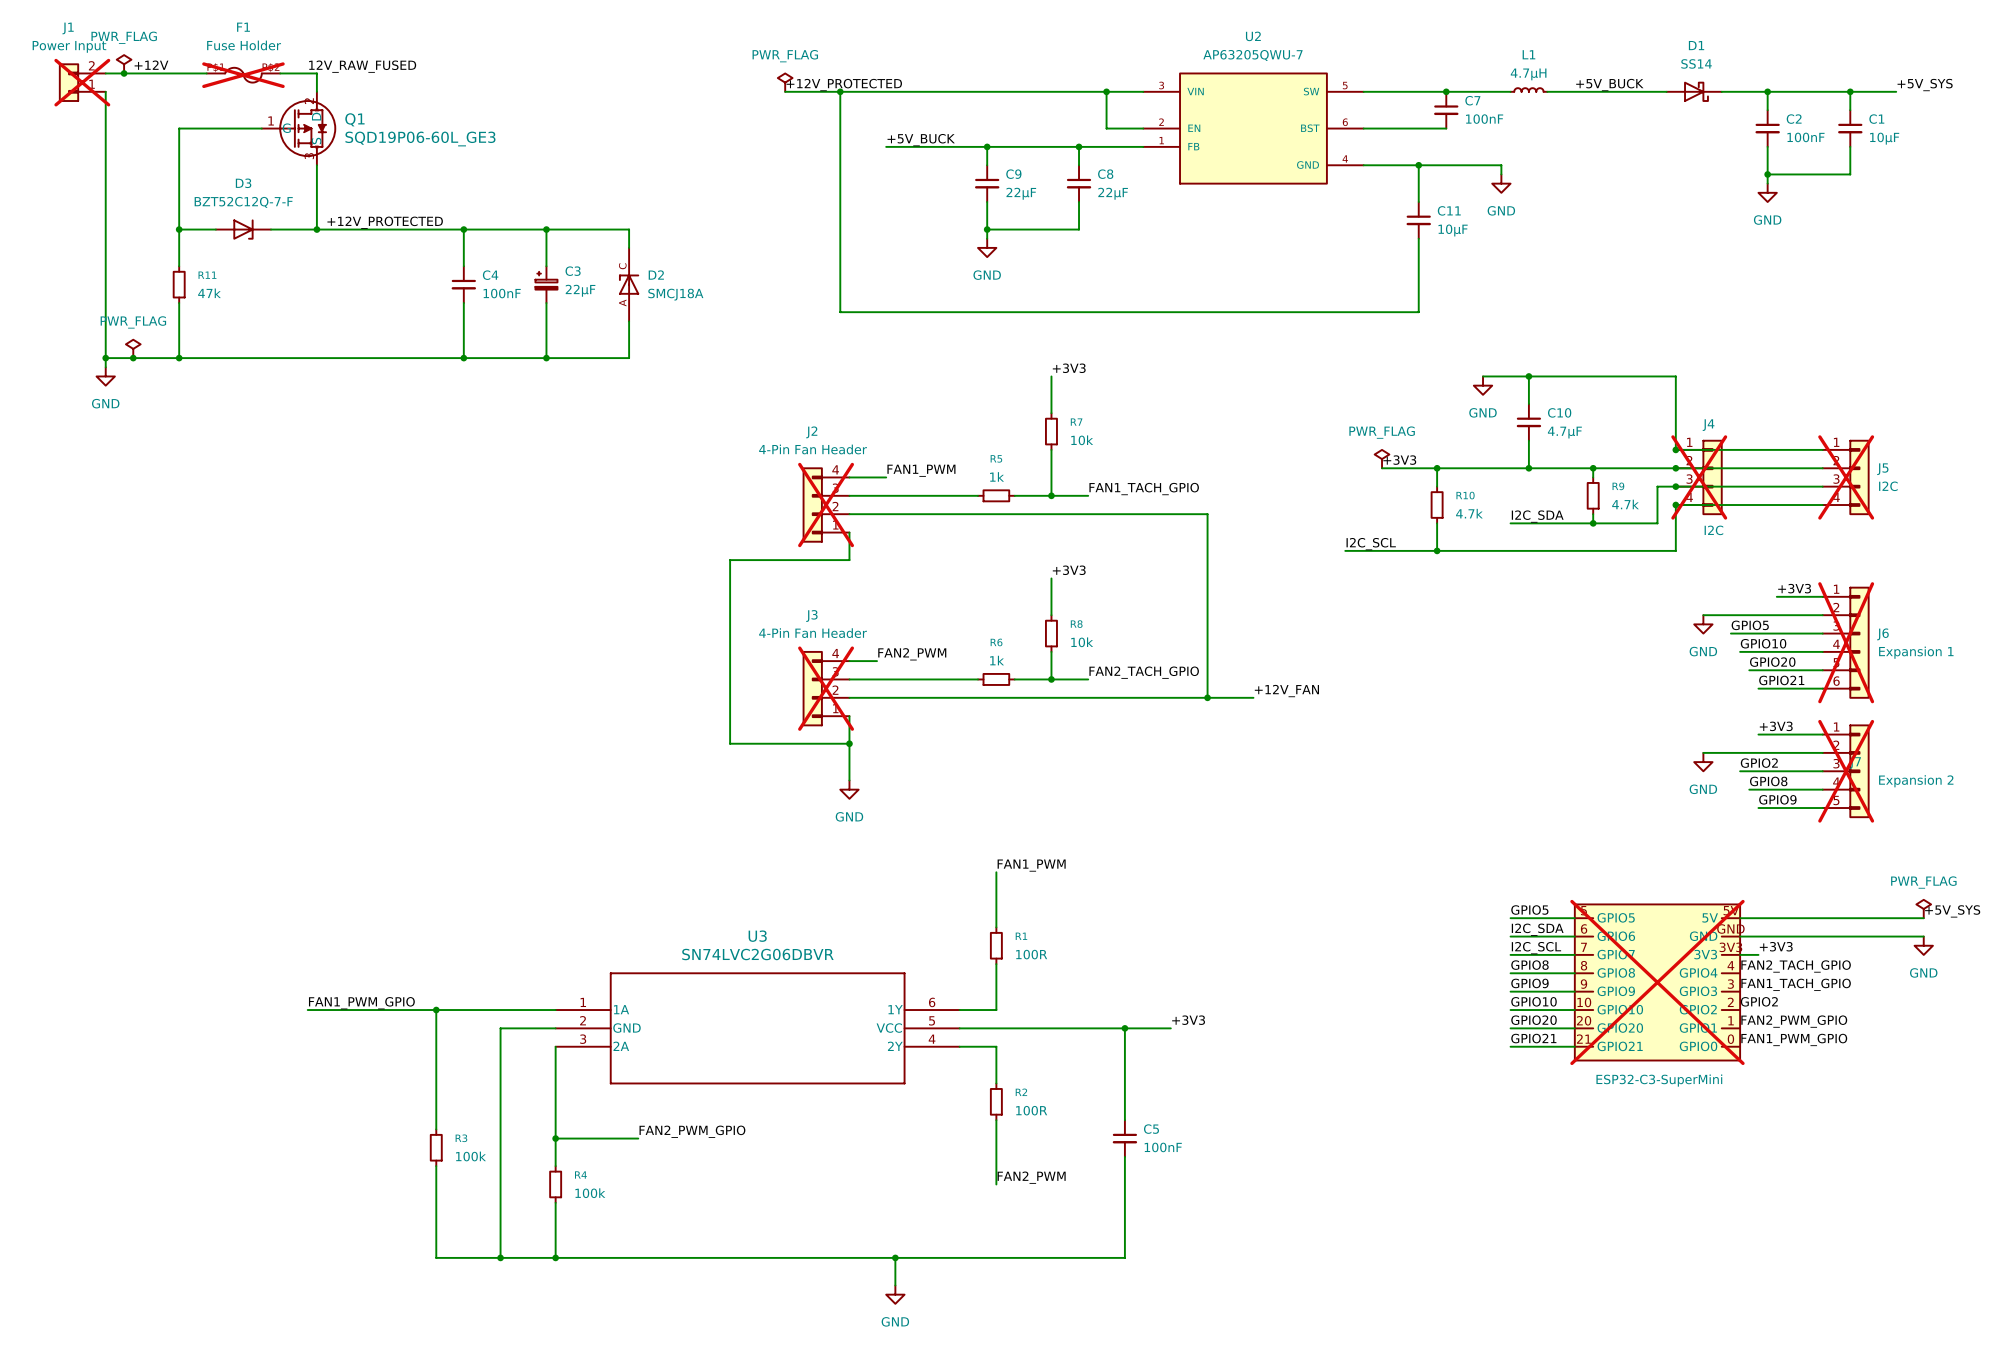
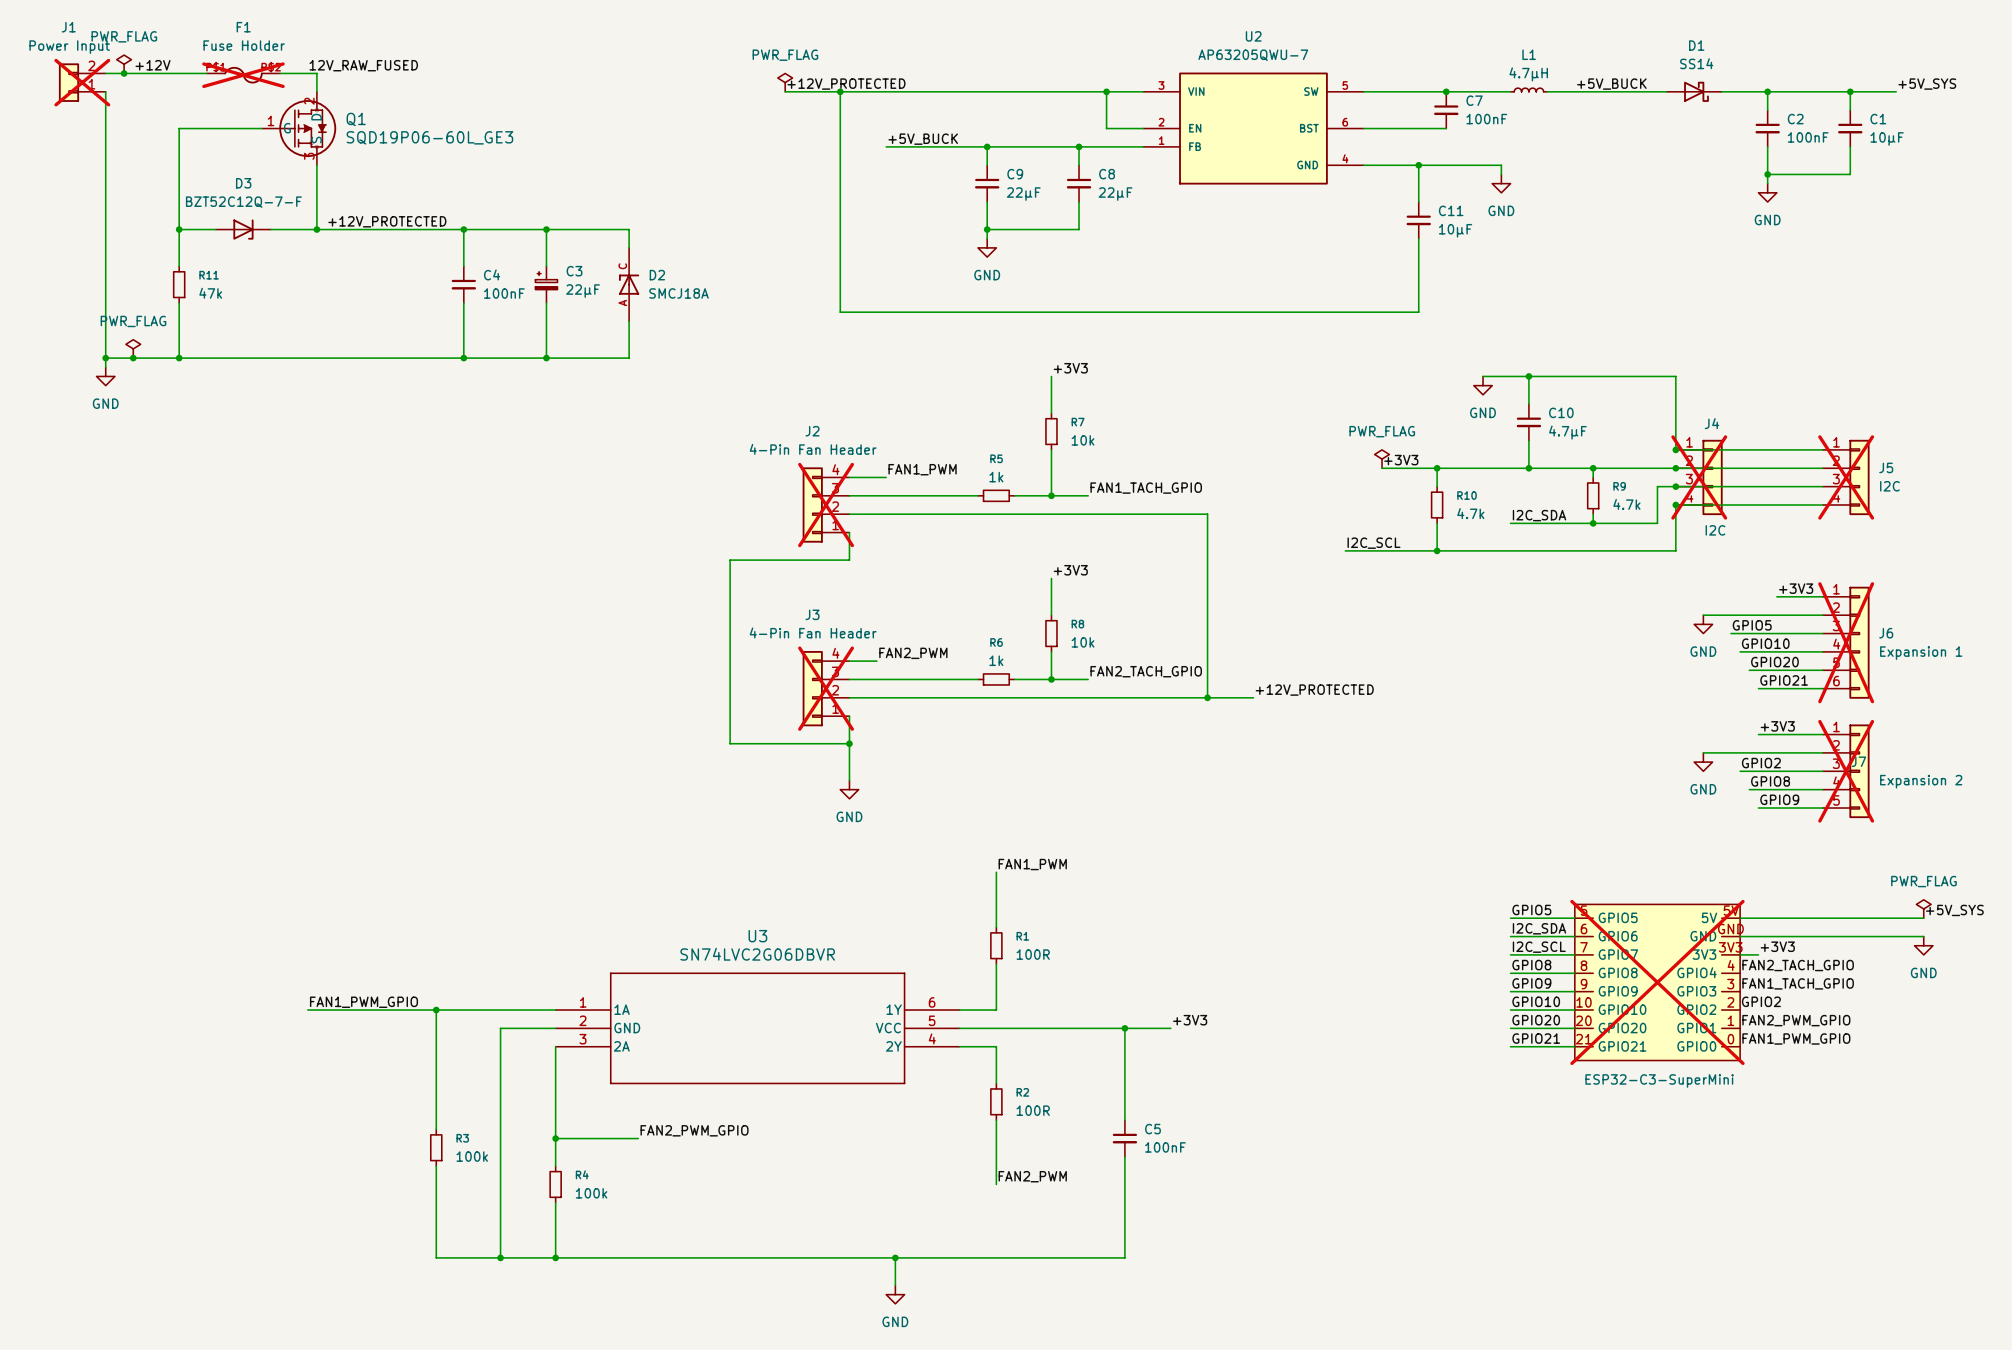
label: +12V_FAN (1286, 691) -> +12V_PROTECTED (1314, 690)

